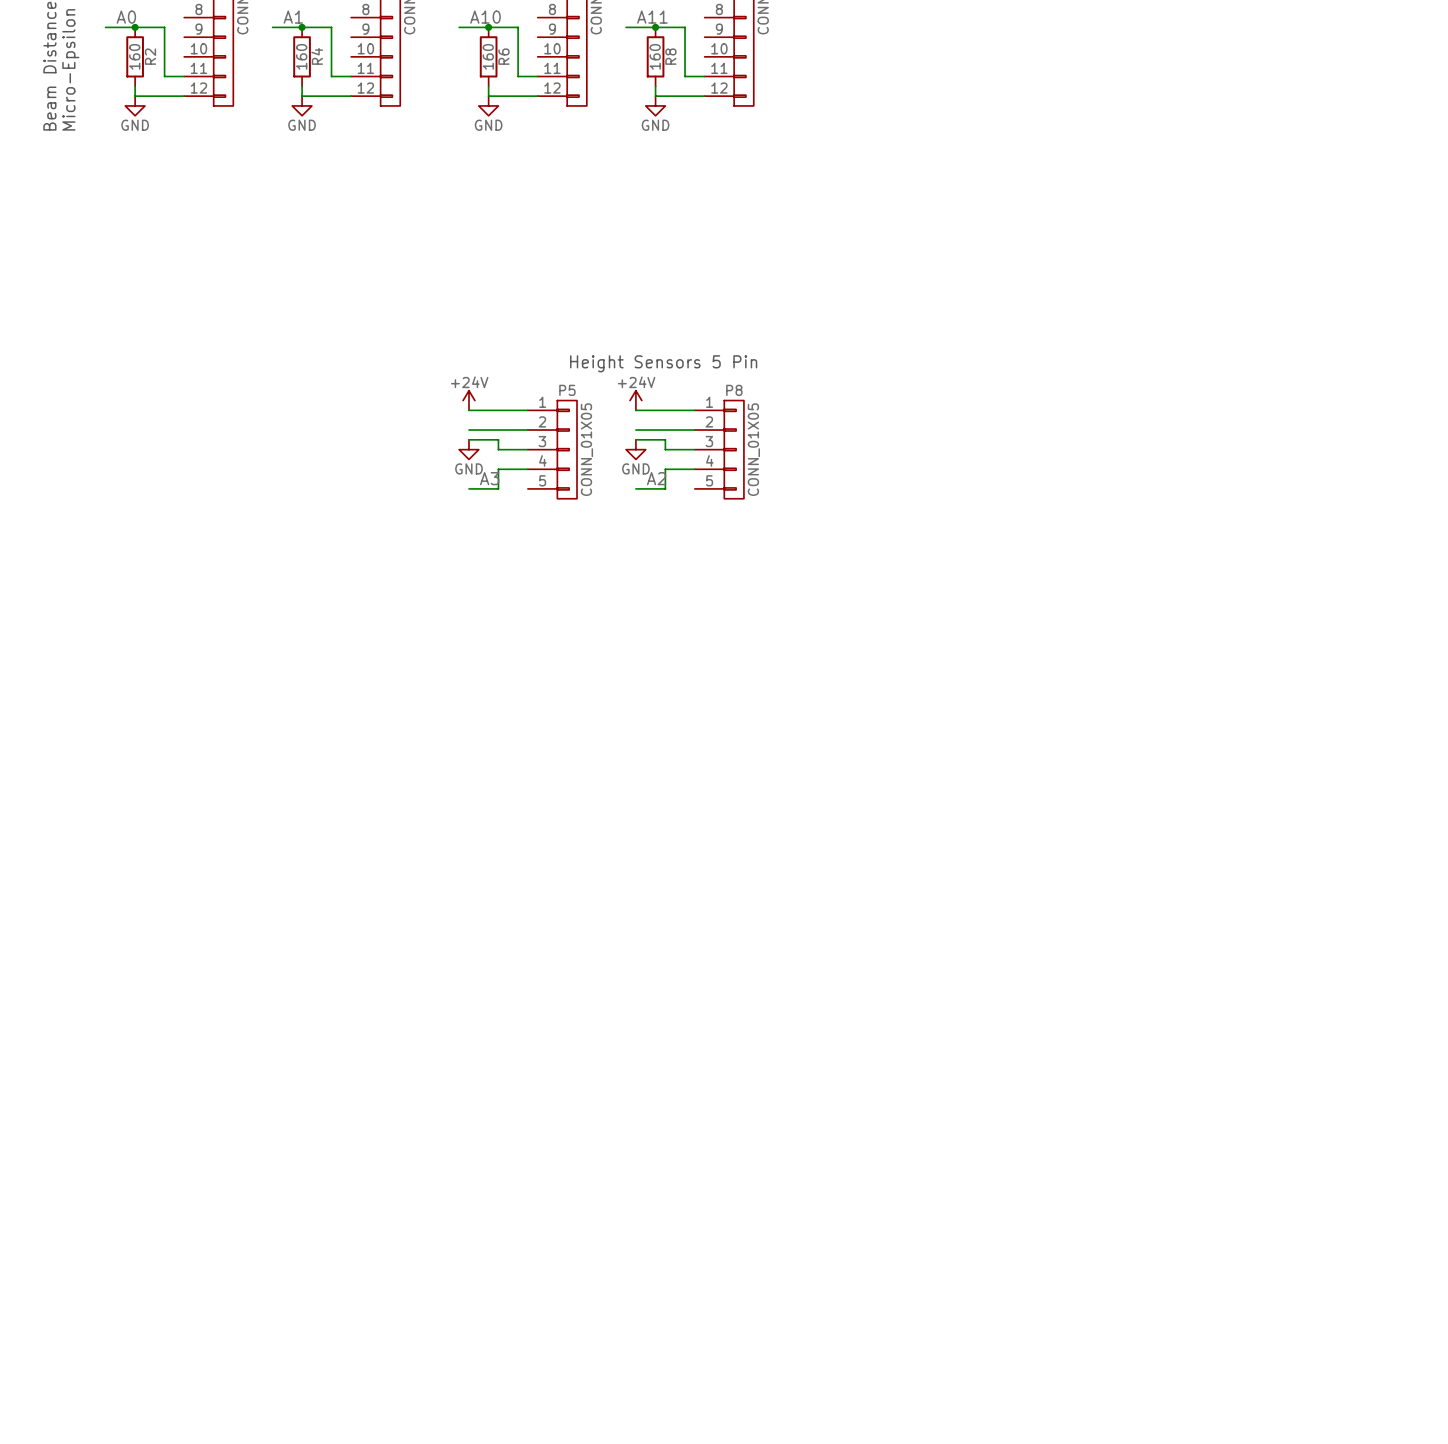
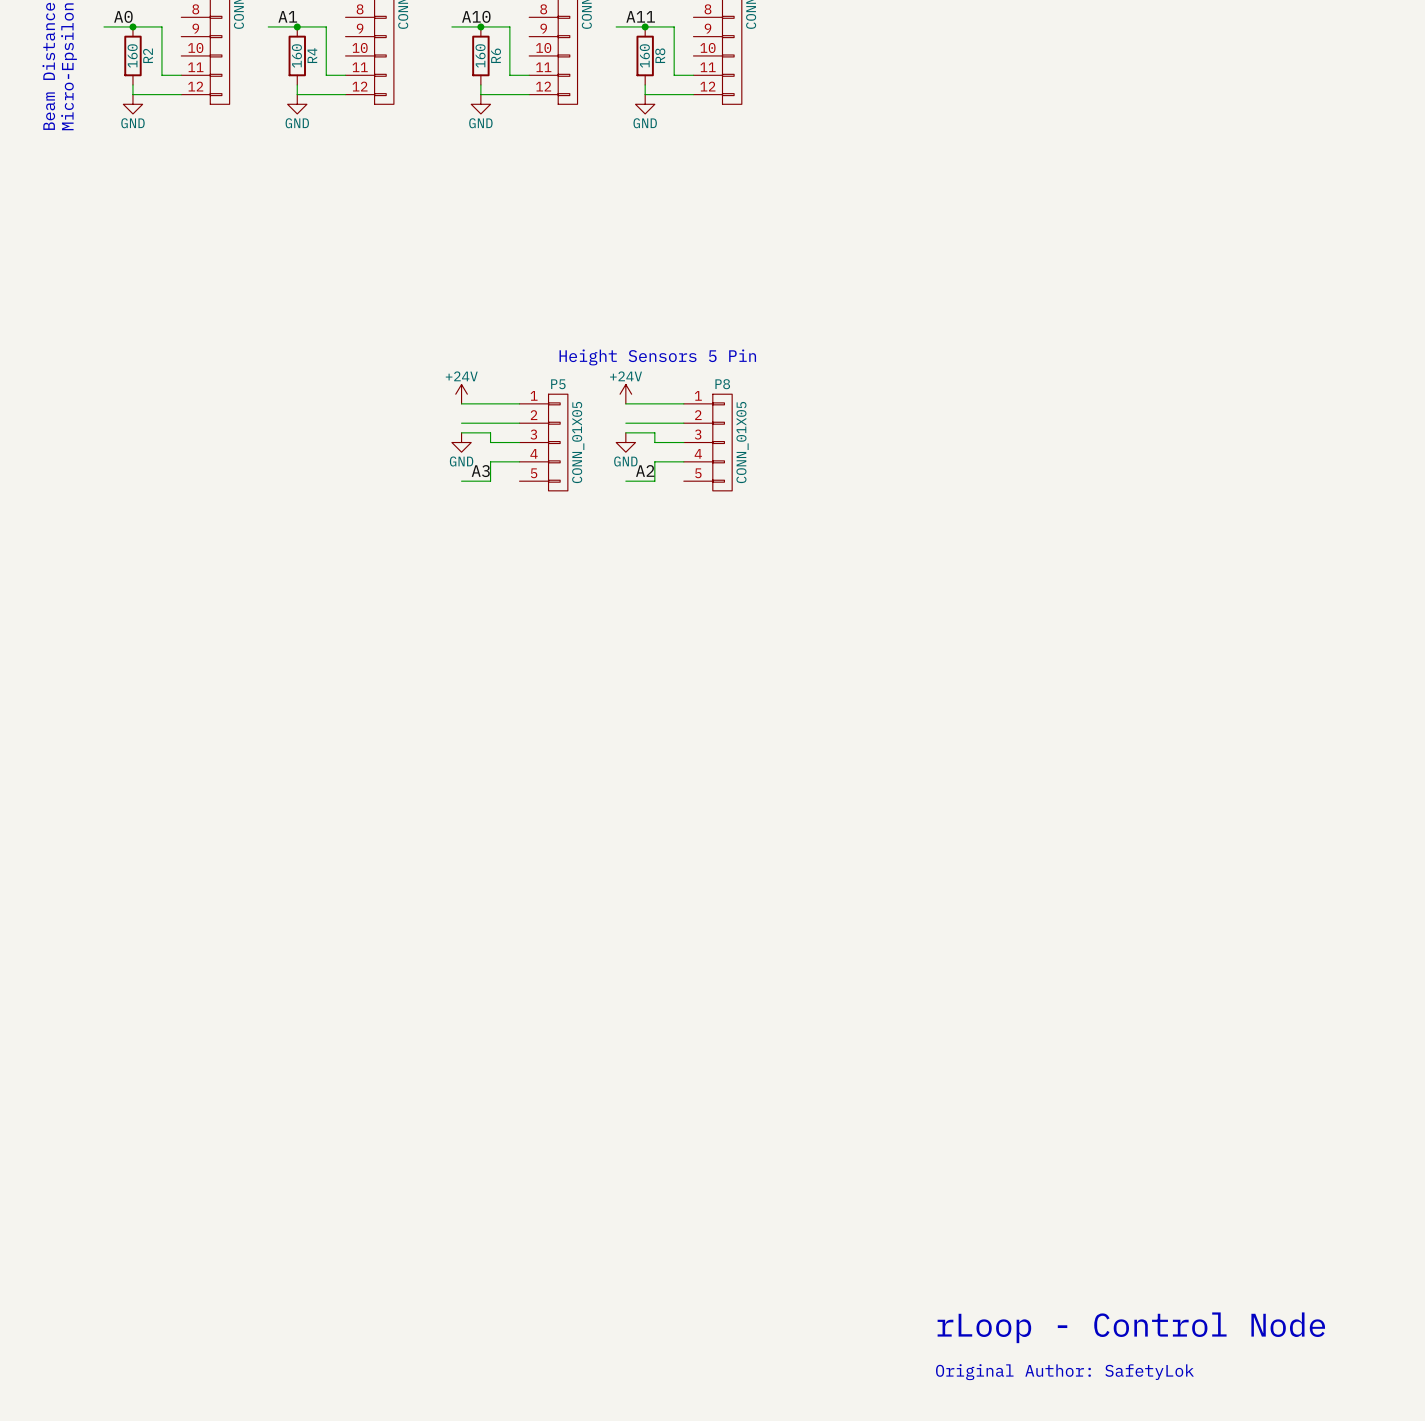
text: none -> rLoop - Control Node (1131, 1327)
text: none -> Original Author: SafetyLok (1064, 1372)

